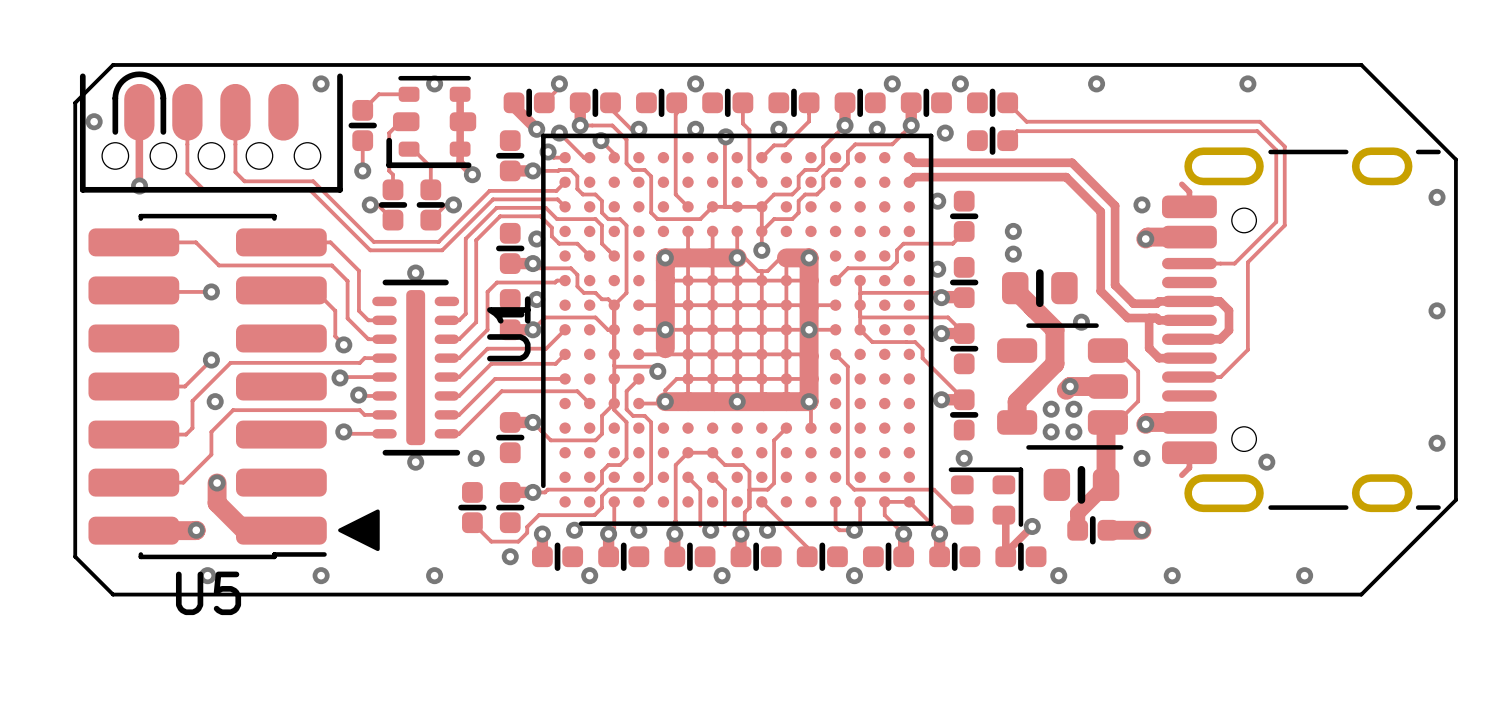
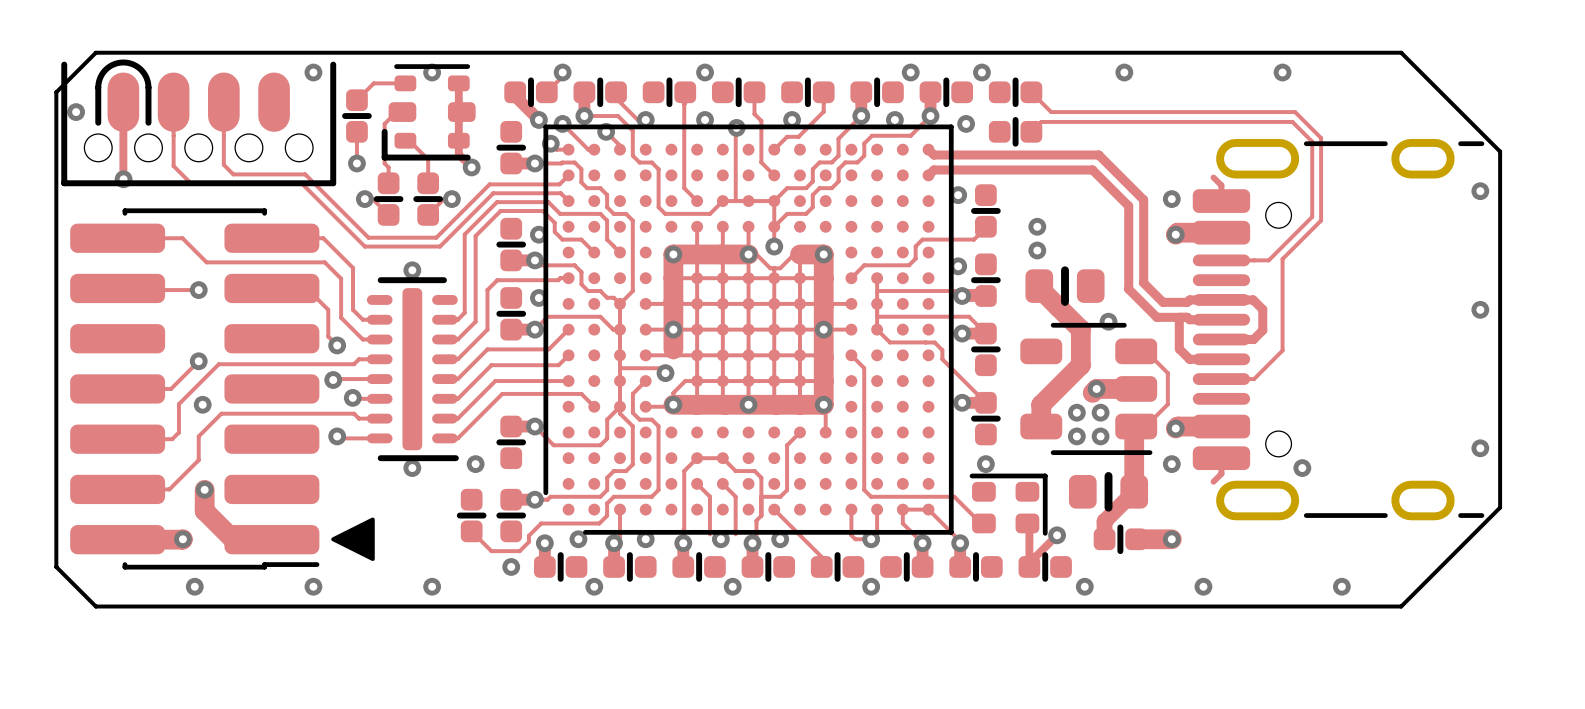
U1 name: U1 (508, 328) -> none
U5 name: U5 (208, 593) -> none

